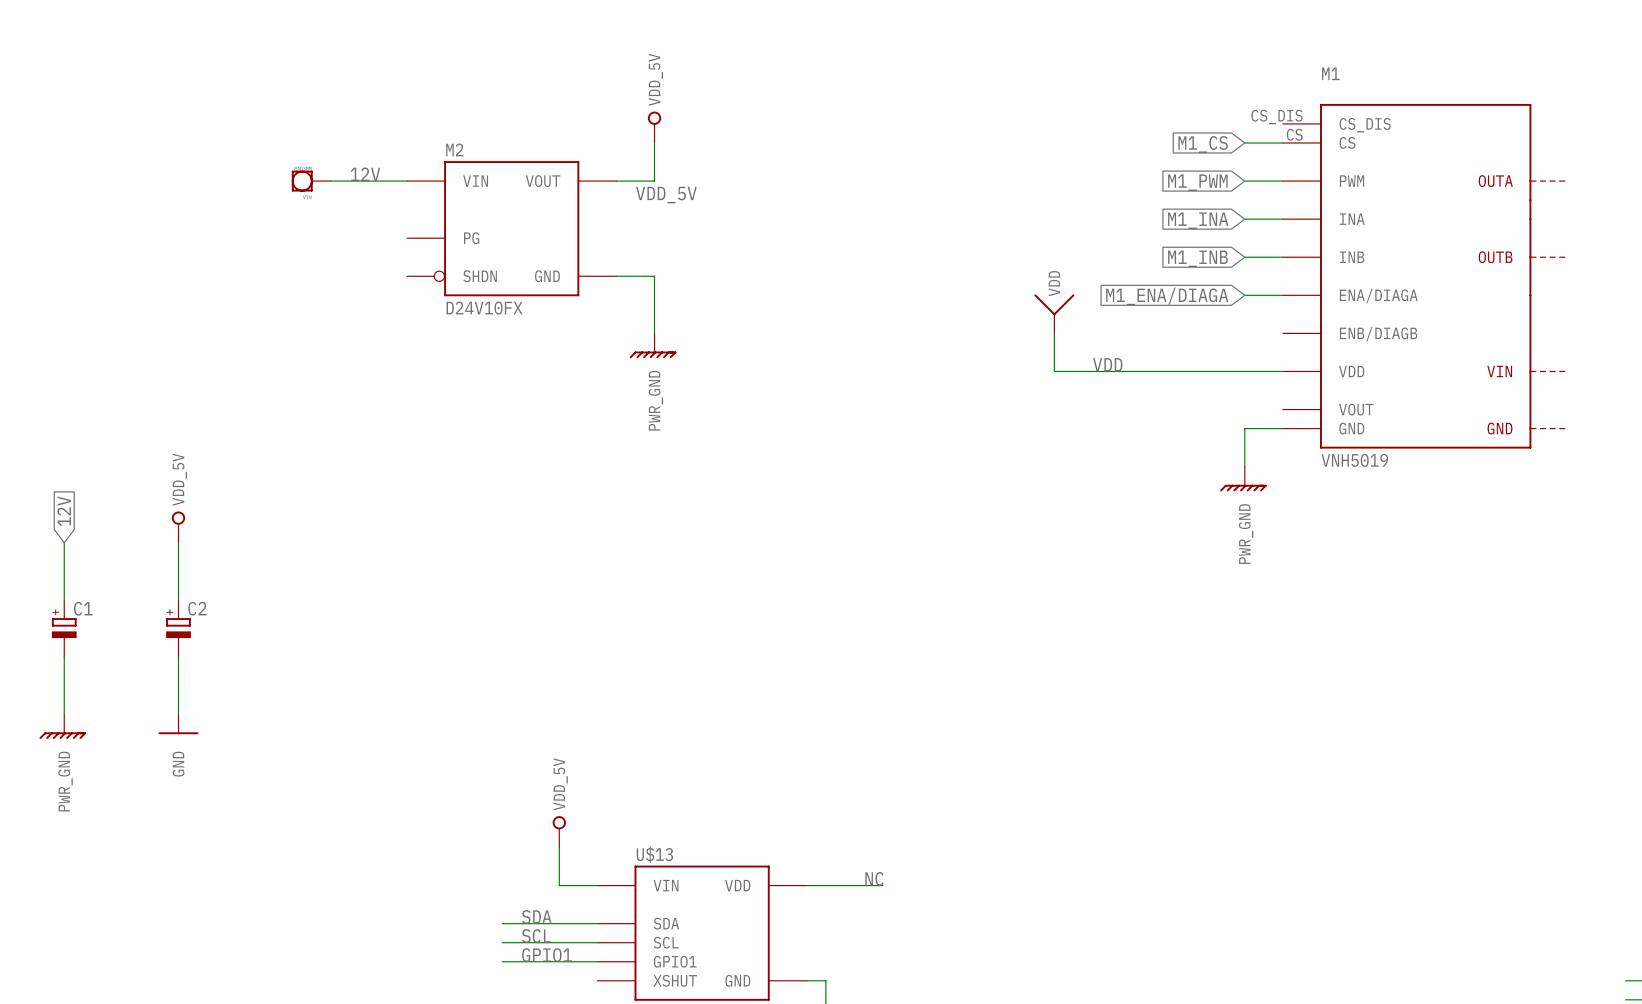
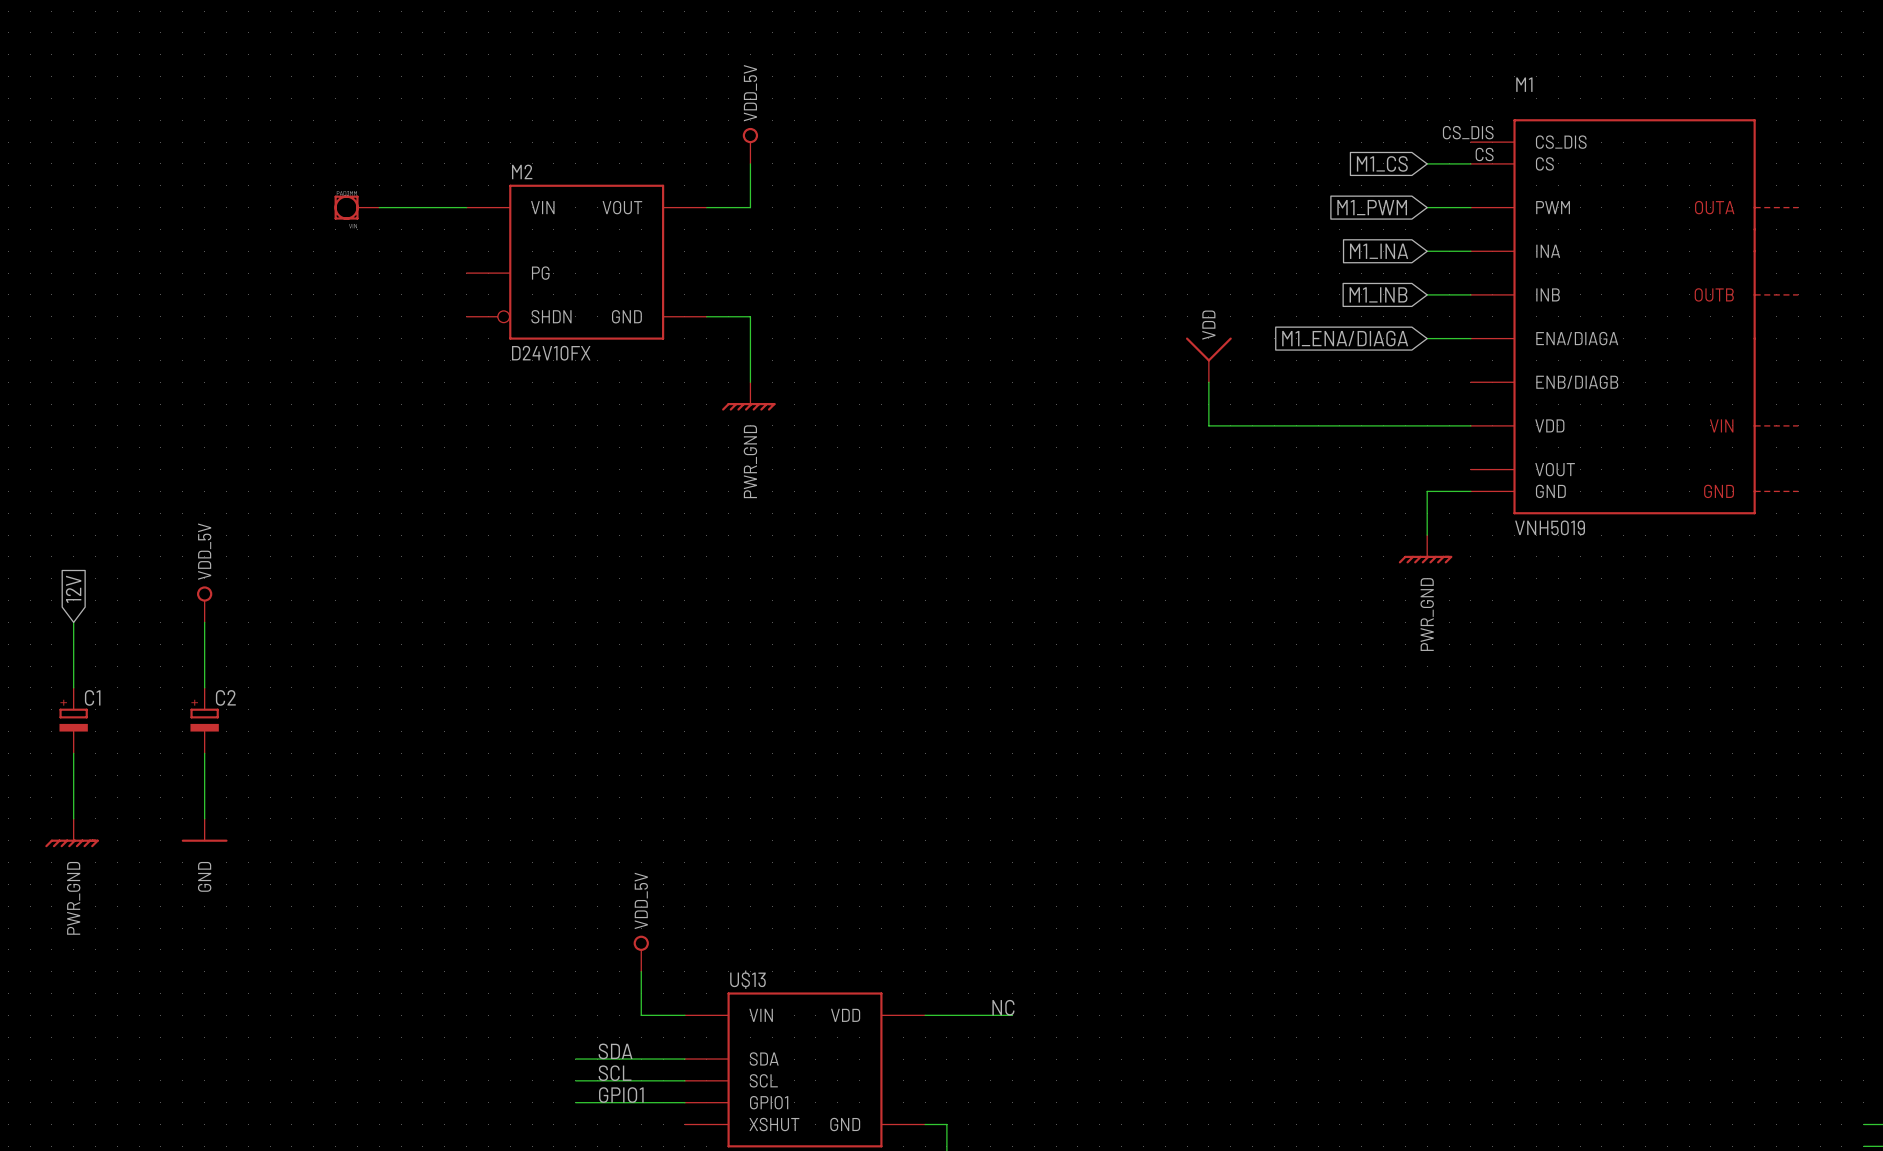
label: 12V (365, 174) -> none
label: VDD_5V (666, 195) -> none
label: VDD (1107, 364) -> none

